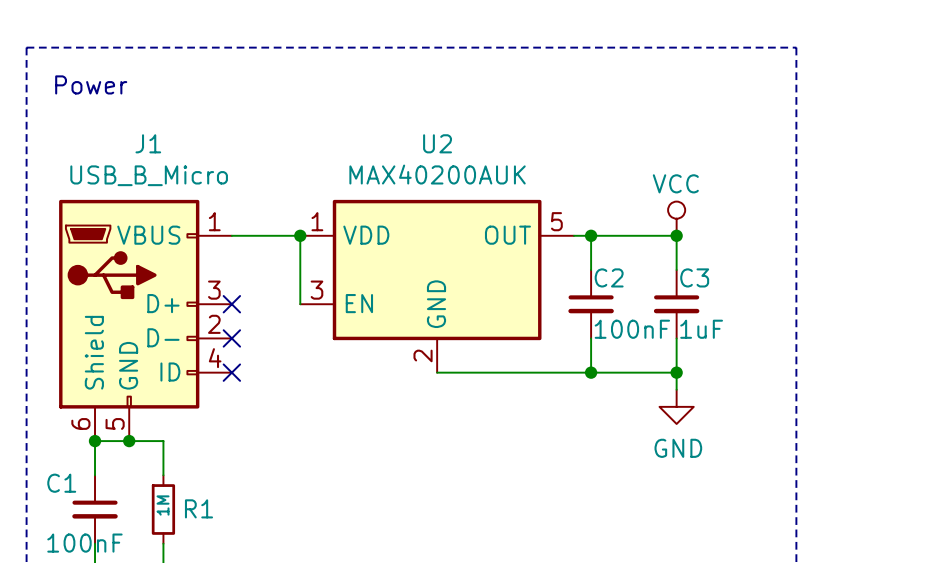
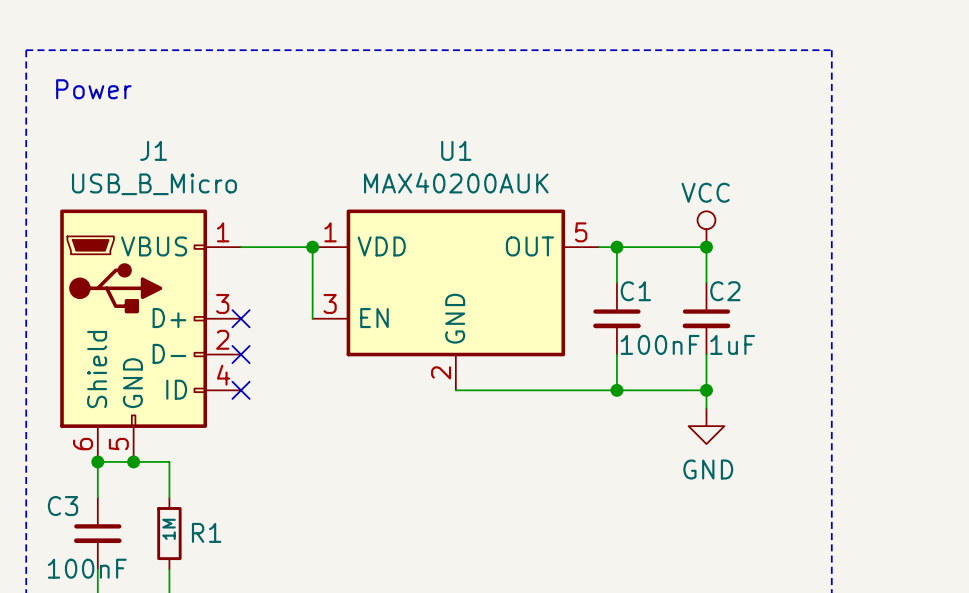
U2 name: U2 (437, 143) -> U1 (456, 150)
C2 name: C2 (609, 277) -> C1 (635, 291)
C3 name: C3 (694, 277) -> C2 (725, 291)
C1 name: C1 (61, 483) -> C3 (62, 506)

